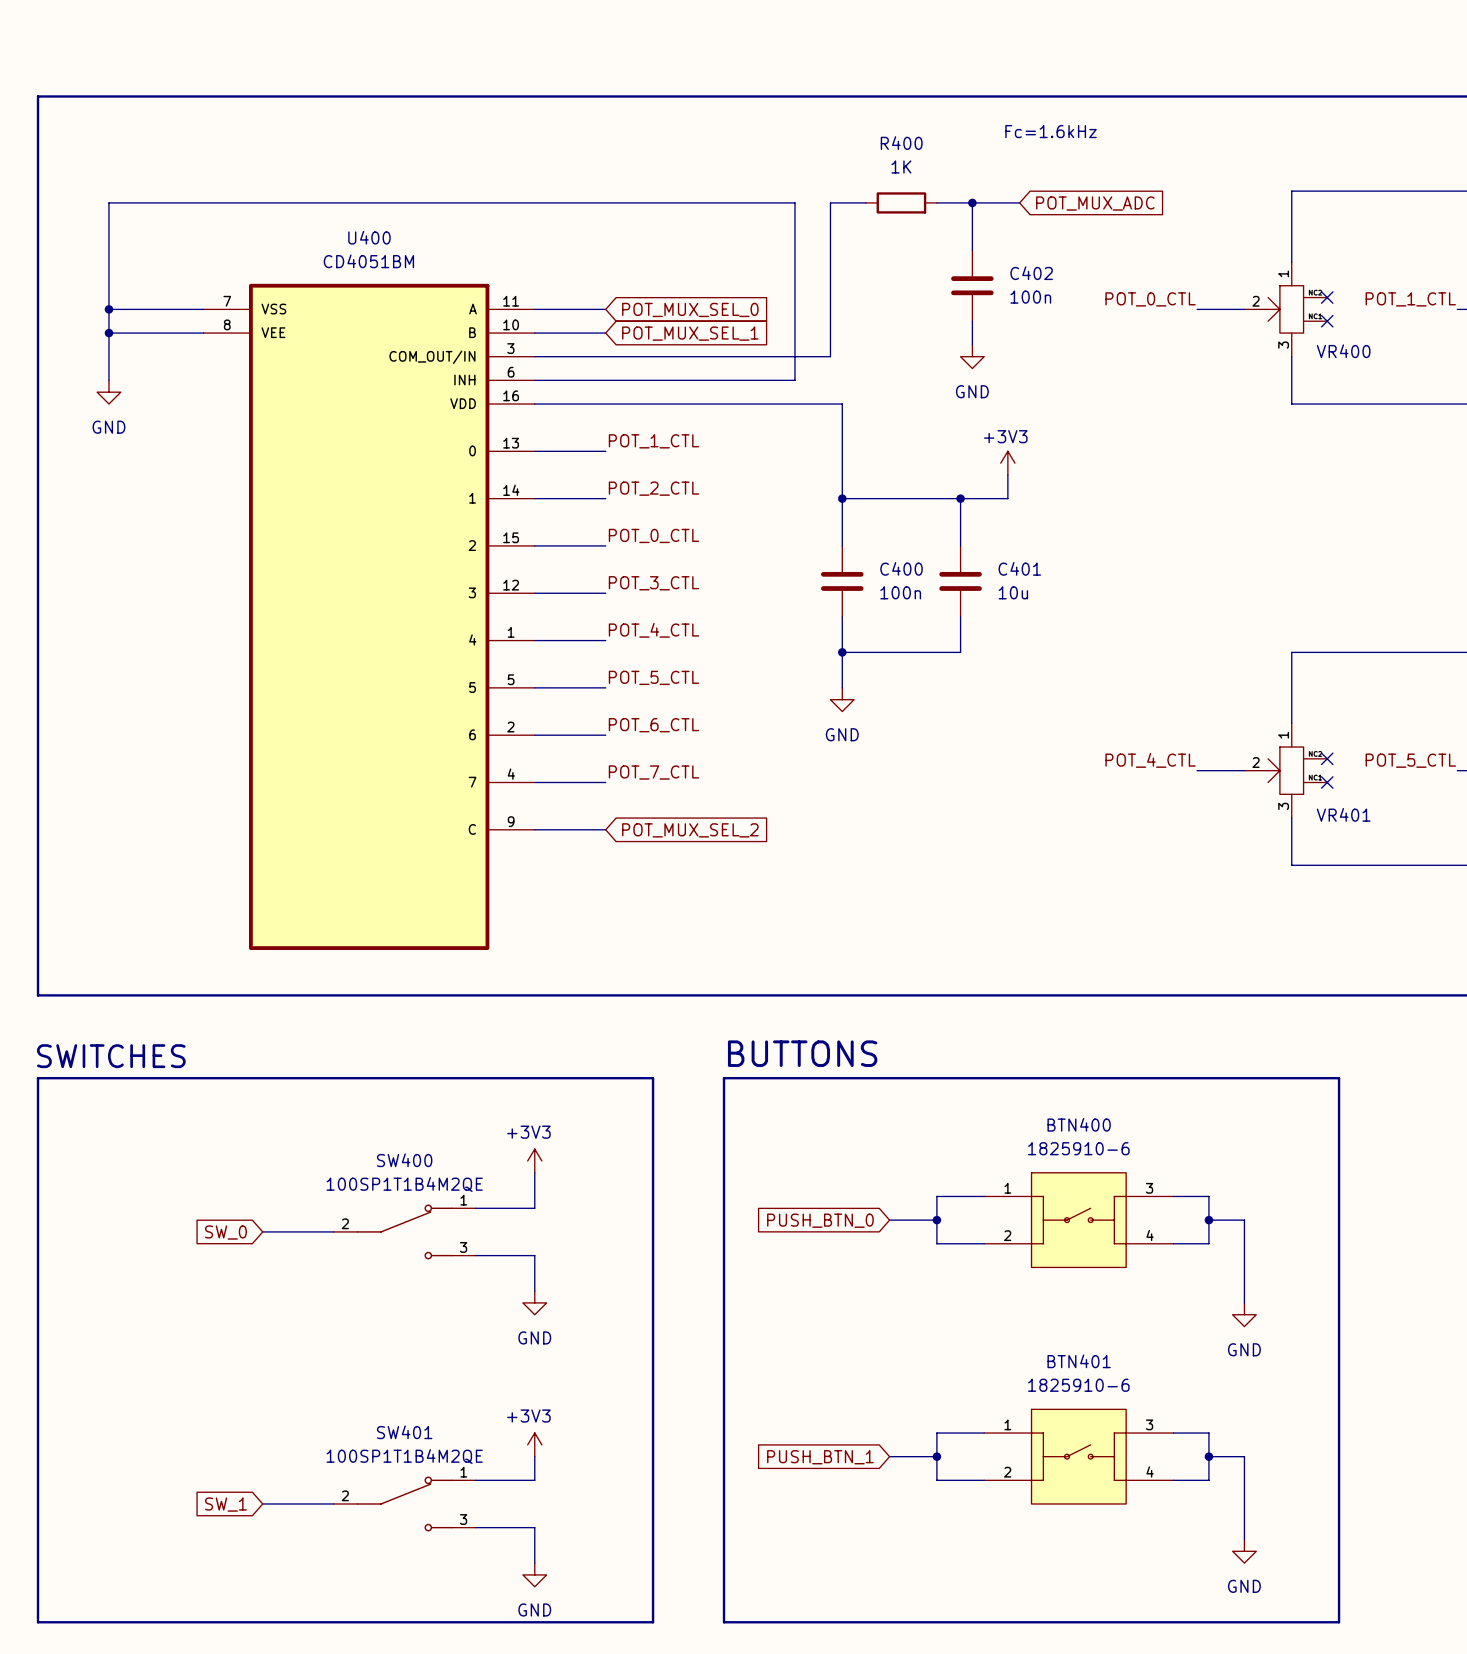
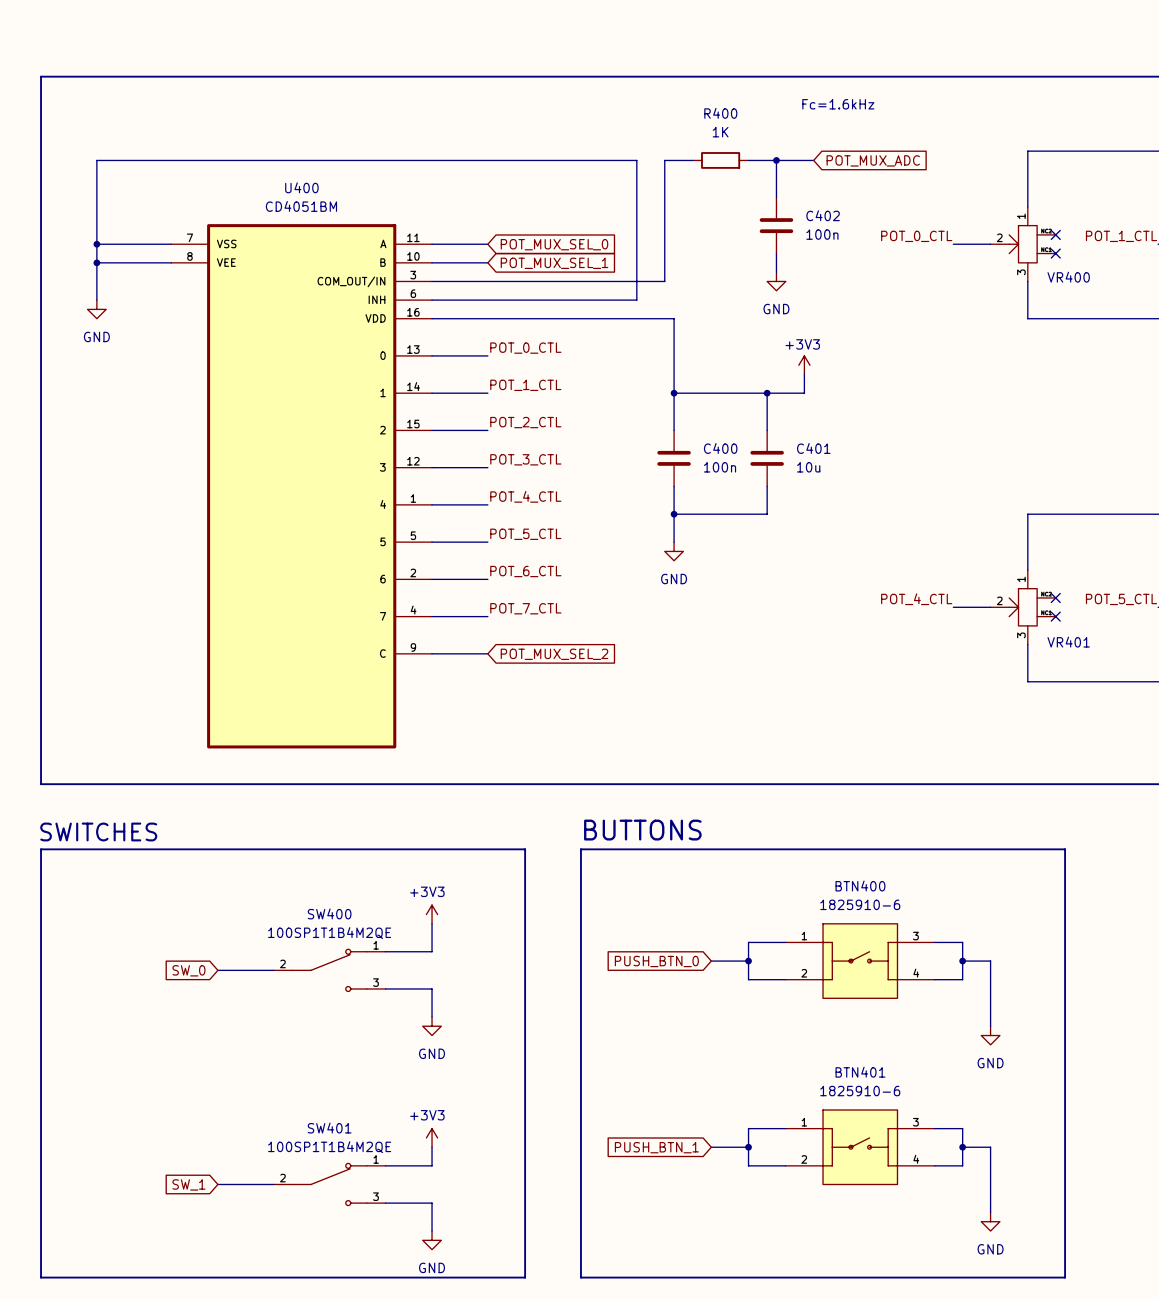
label: POT_1_CTL (653, 441) -> POT_0_CTL (525, 348)
label: POT_2_CTL (653, 488) -> POT_1_CTL (525, 385)
label: POT_0_CTL (653, 535) -> POT_2_CTL (525, 422)

